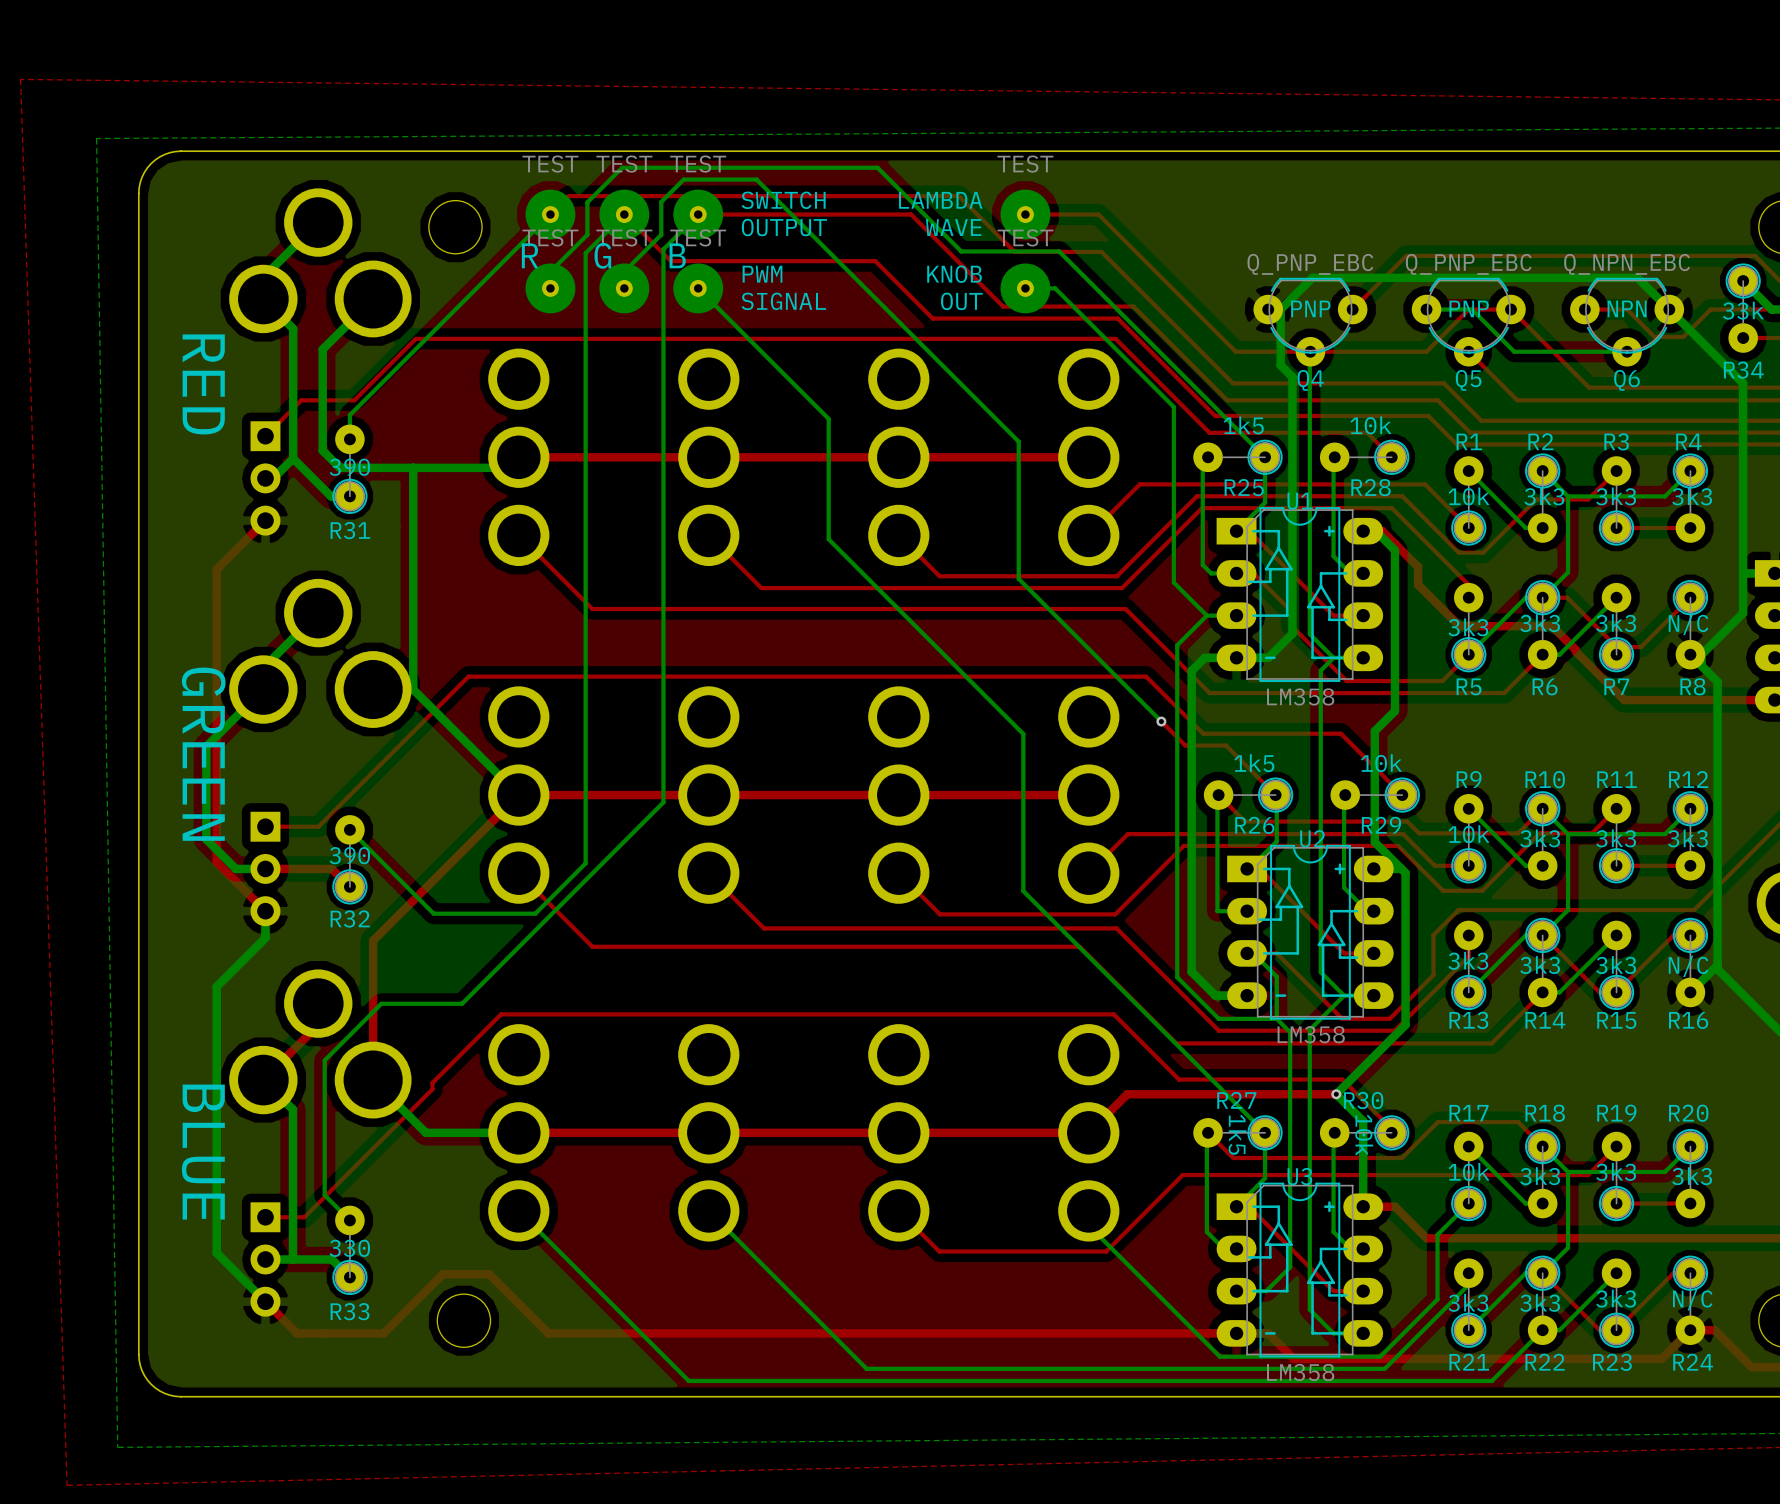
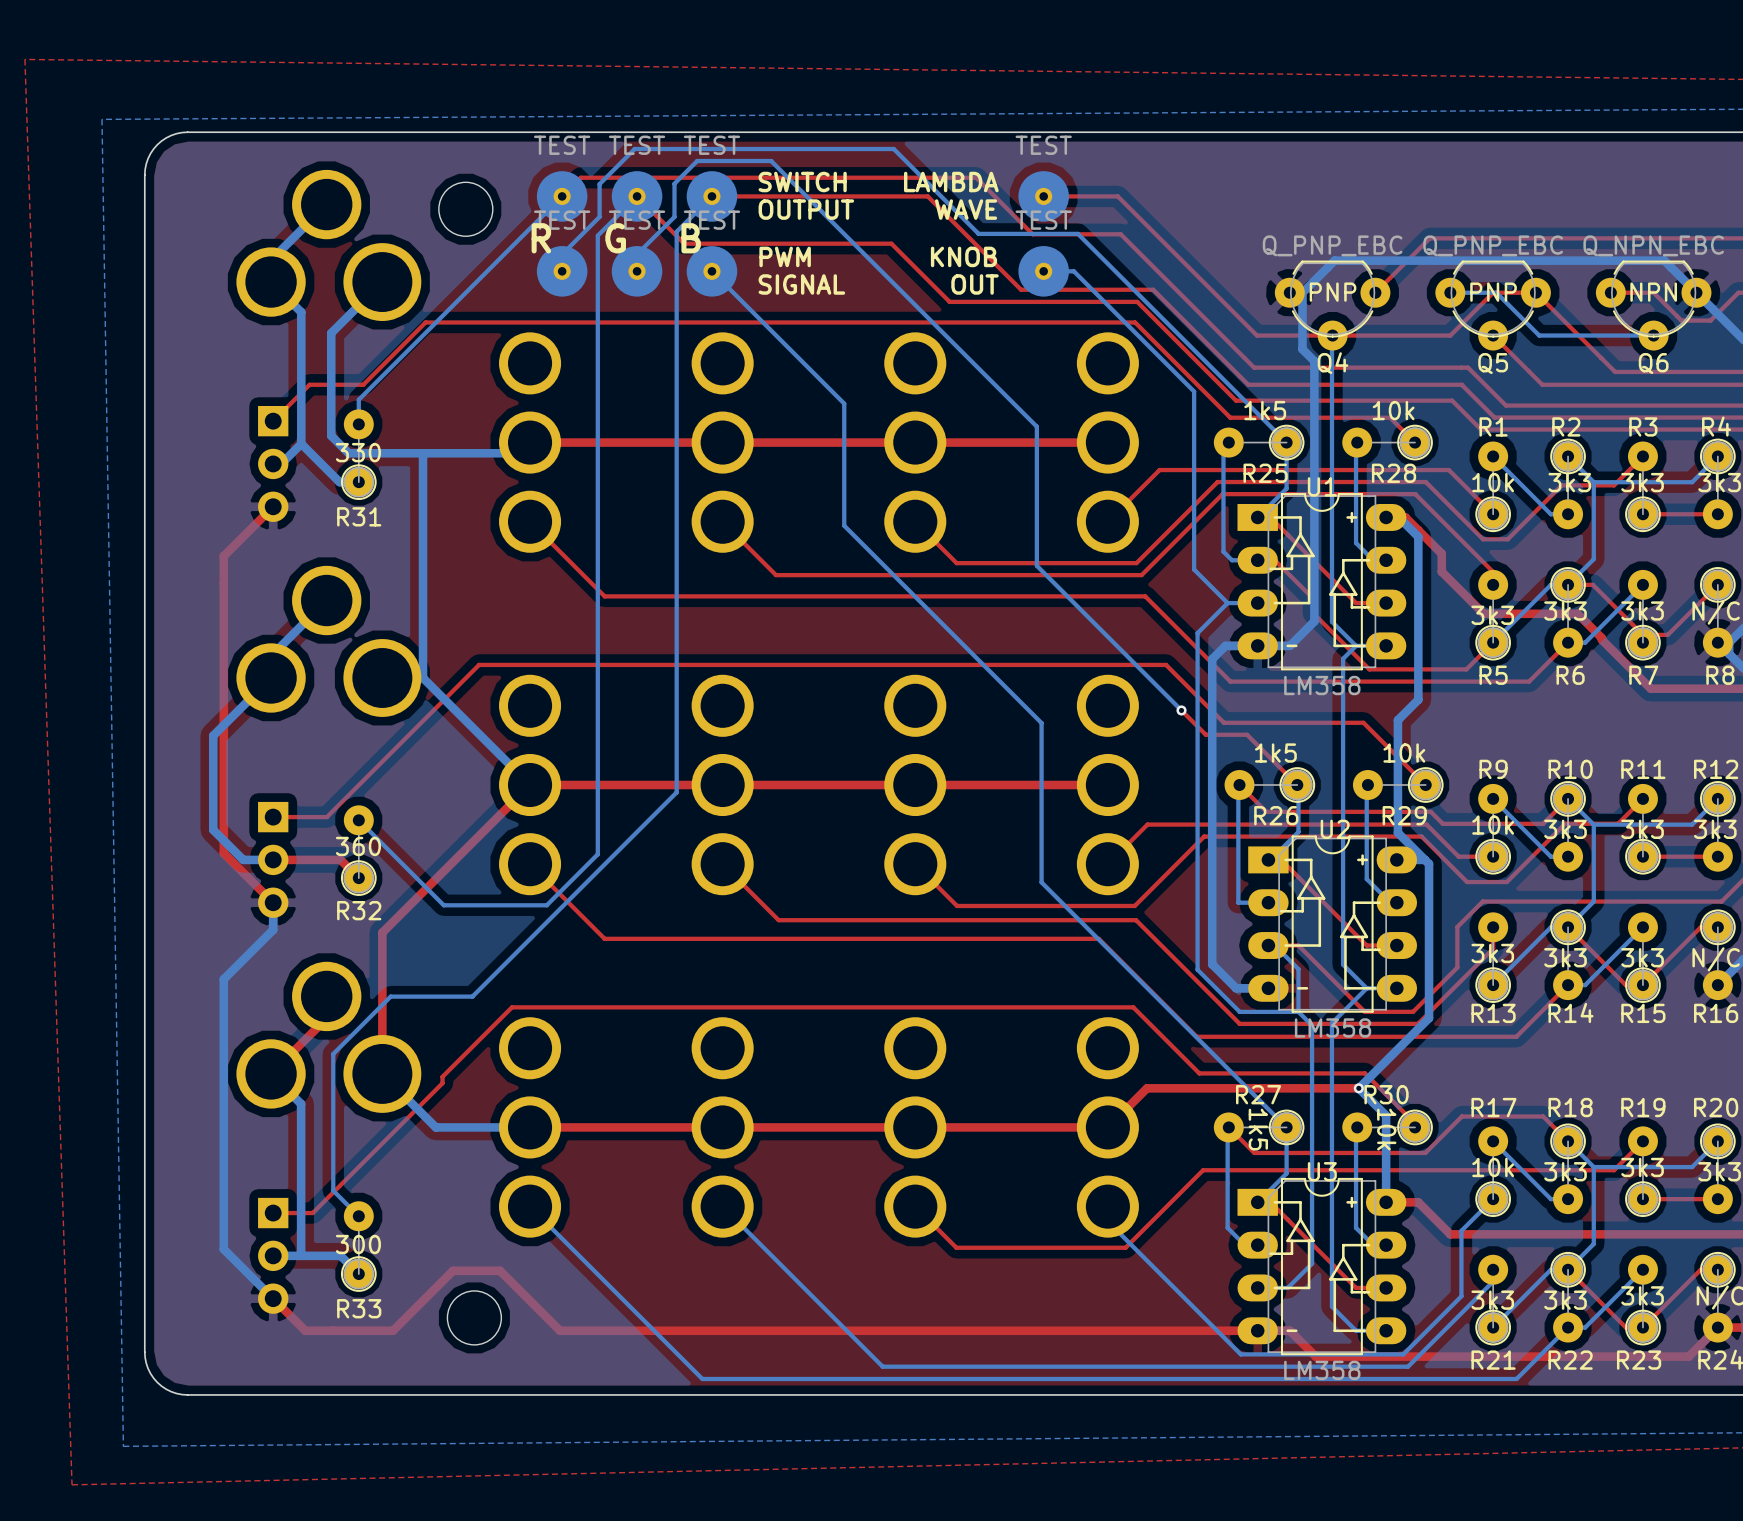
text: RED (203, 384) -> none
R31 value: 390 (349, 467) -> 330 (358, 452)
text: GREEN (203, 754) -> none
R32 value: 390 (349, 855) -> 360 (358, 846)
text: BLUE (203, 1152) -> none
R33 value: 330 (349, 1248) -> 300 (358, 1244)

